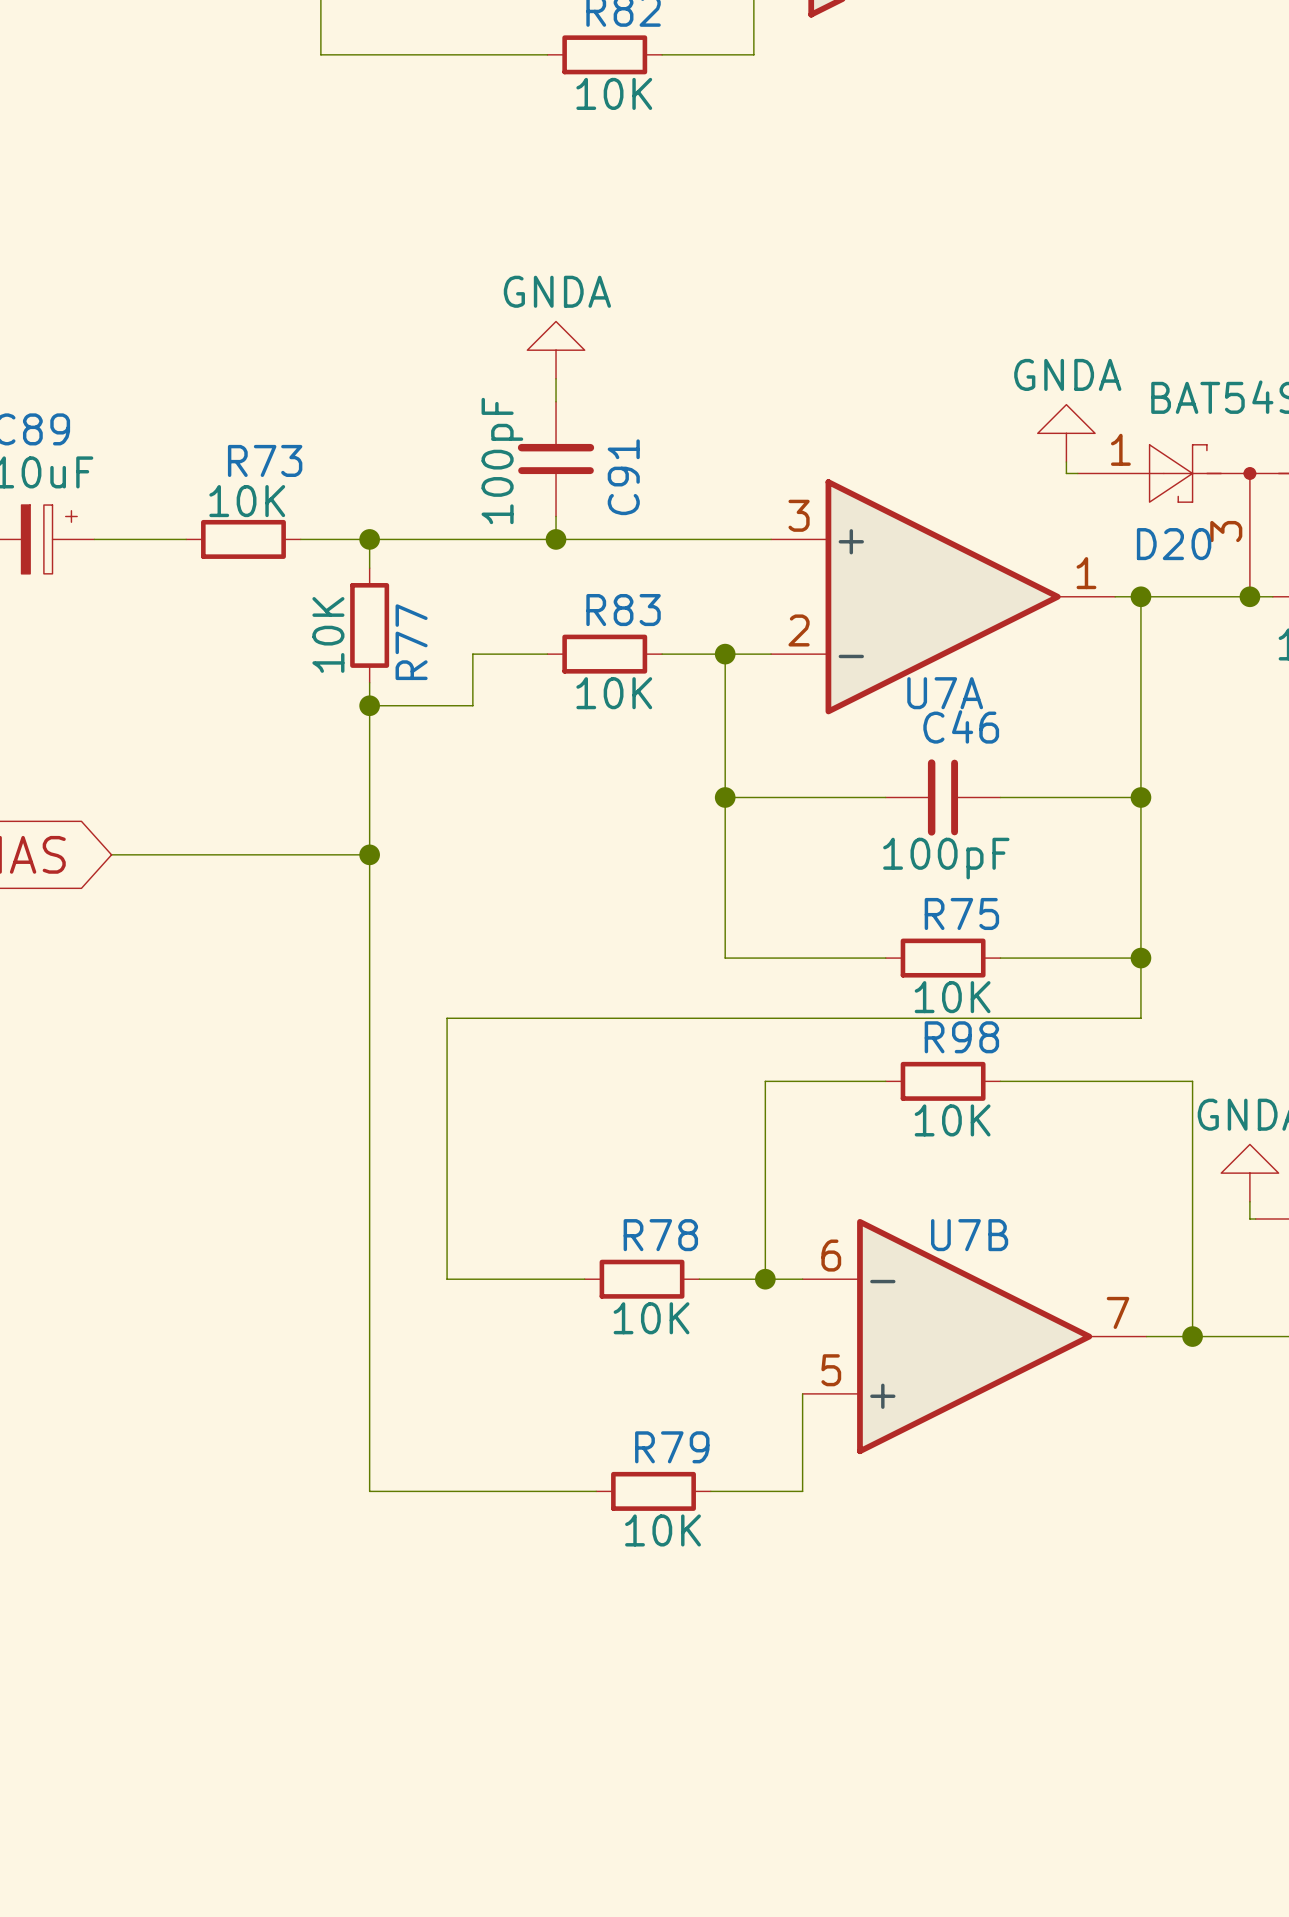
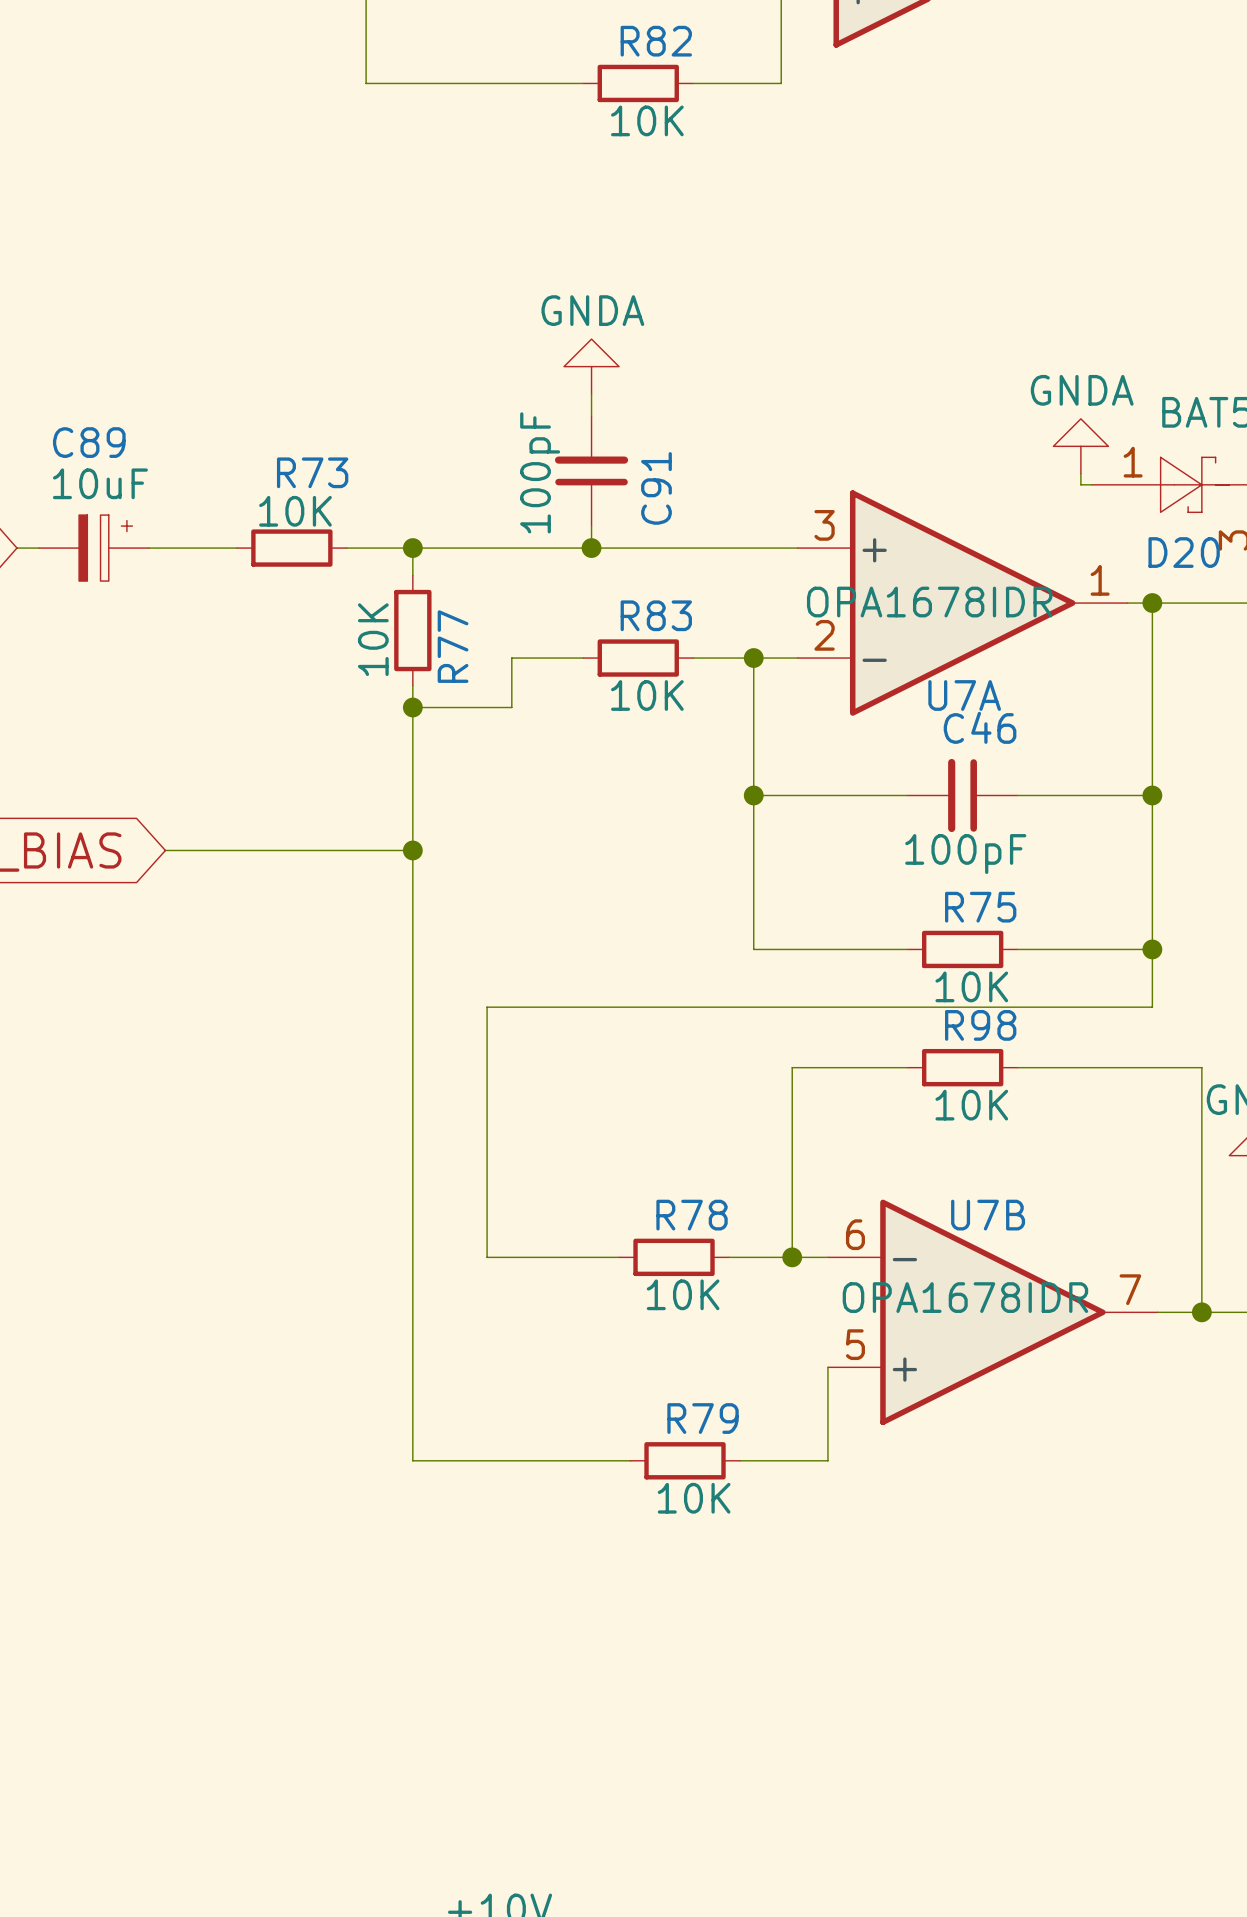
U7A value: none -> OPA1678IDR (929, 602)
U7B value: none -> OPA1678IDR (965, 1297)

